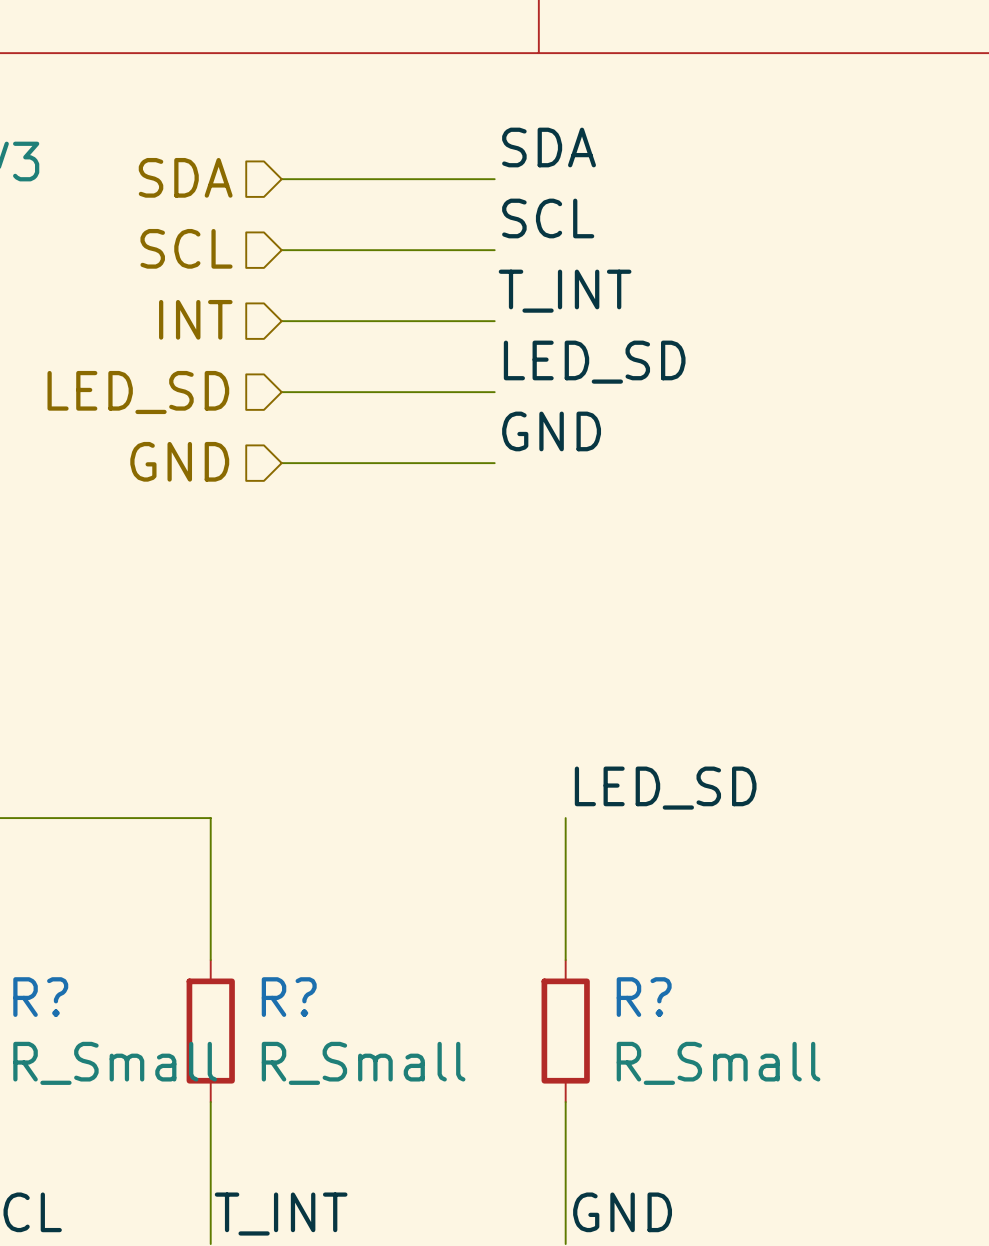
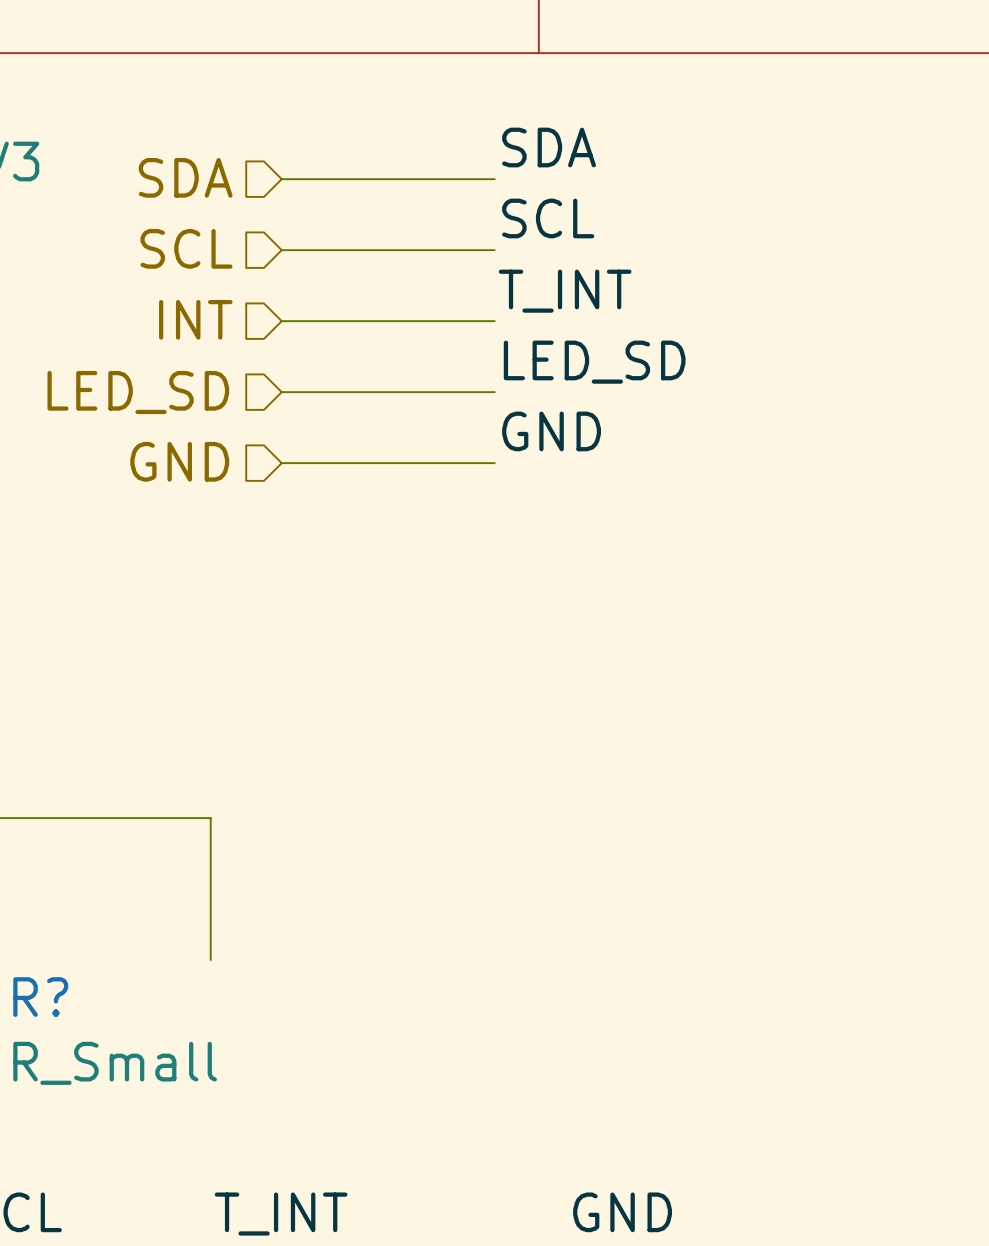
label: LED_SD (665, 788) -> none
wire: (565, 818) (565, 960) -> none
R?: R_Small (210, 1031) -> none
R?: R_Small (565, 1031) -> none
wire: (210, 1102) (210, 1244) -> none
wire: (565, 1102) (565, 1244) -> none

